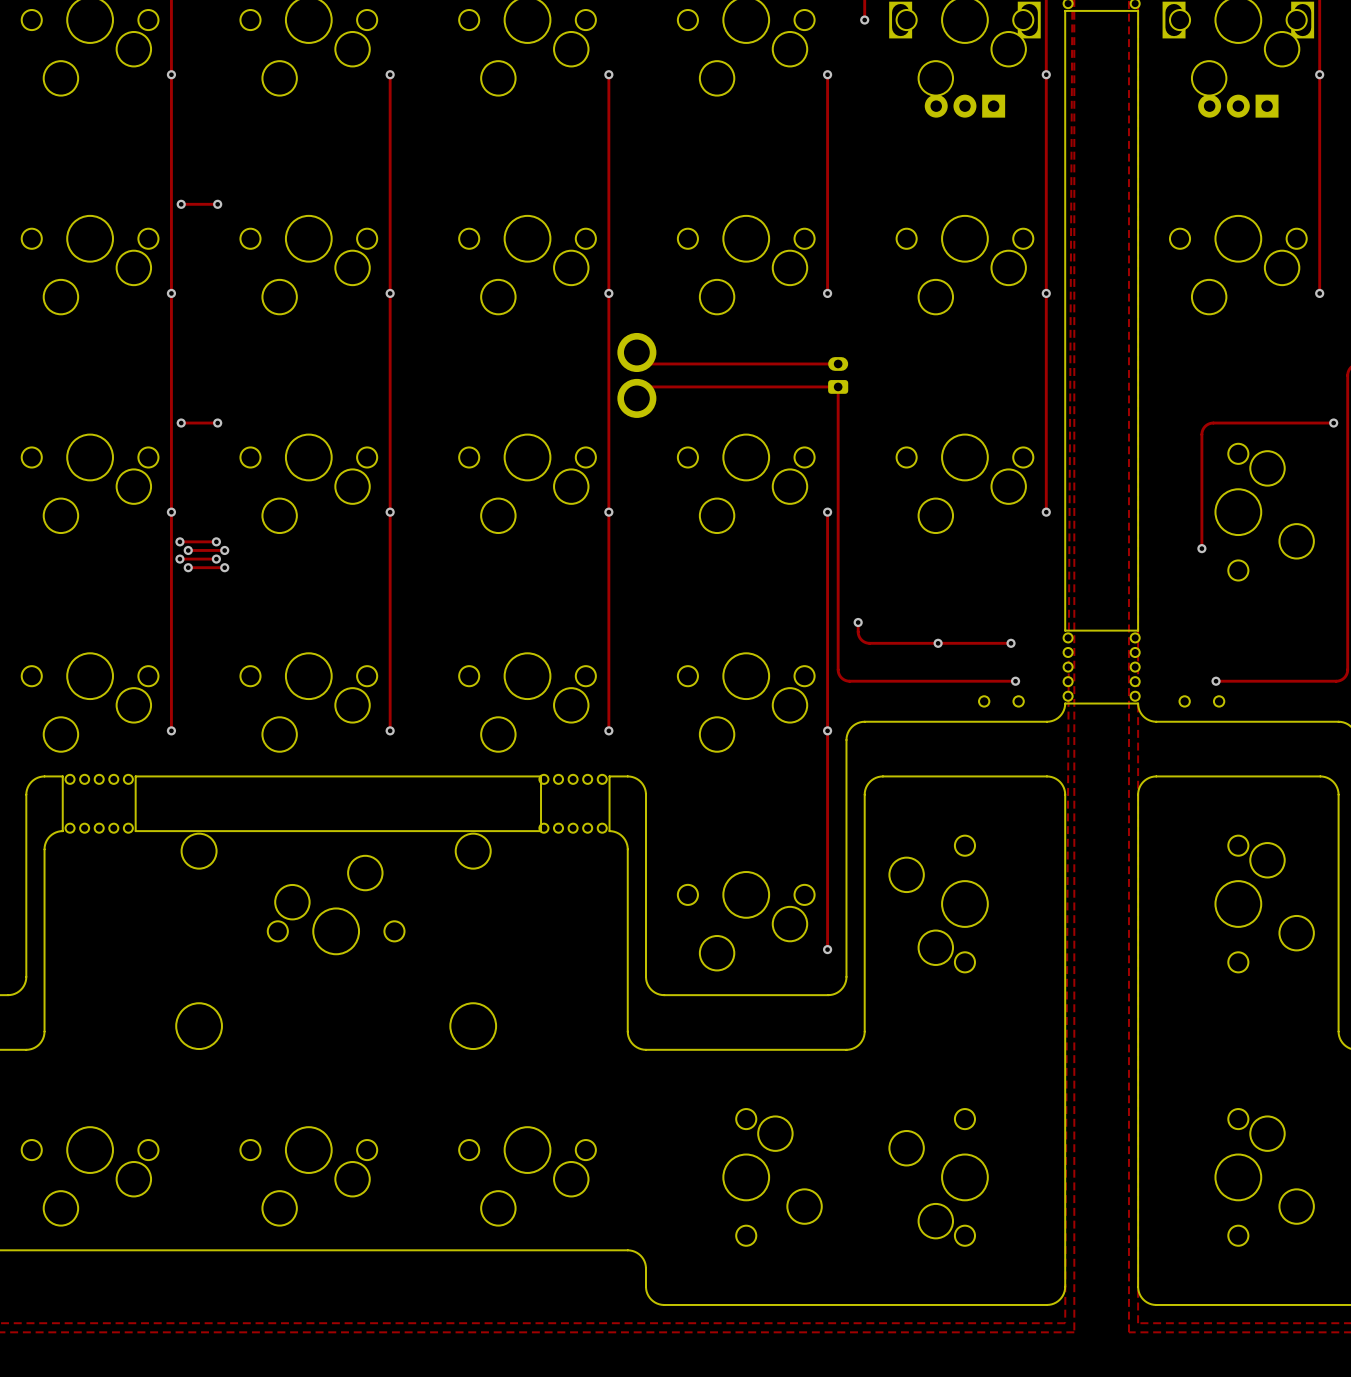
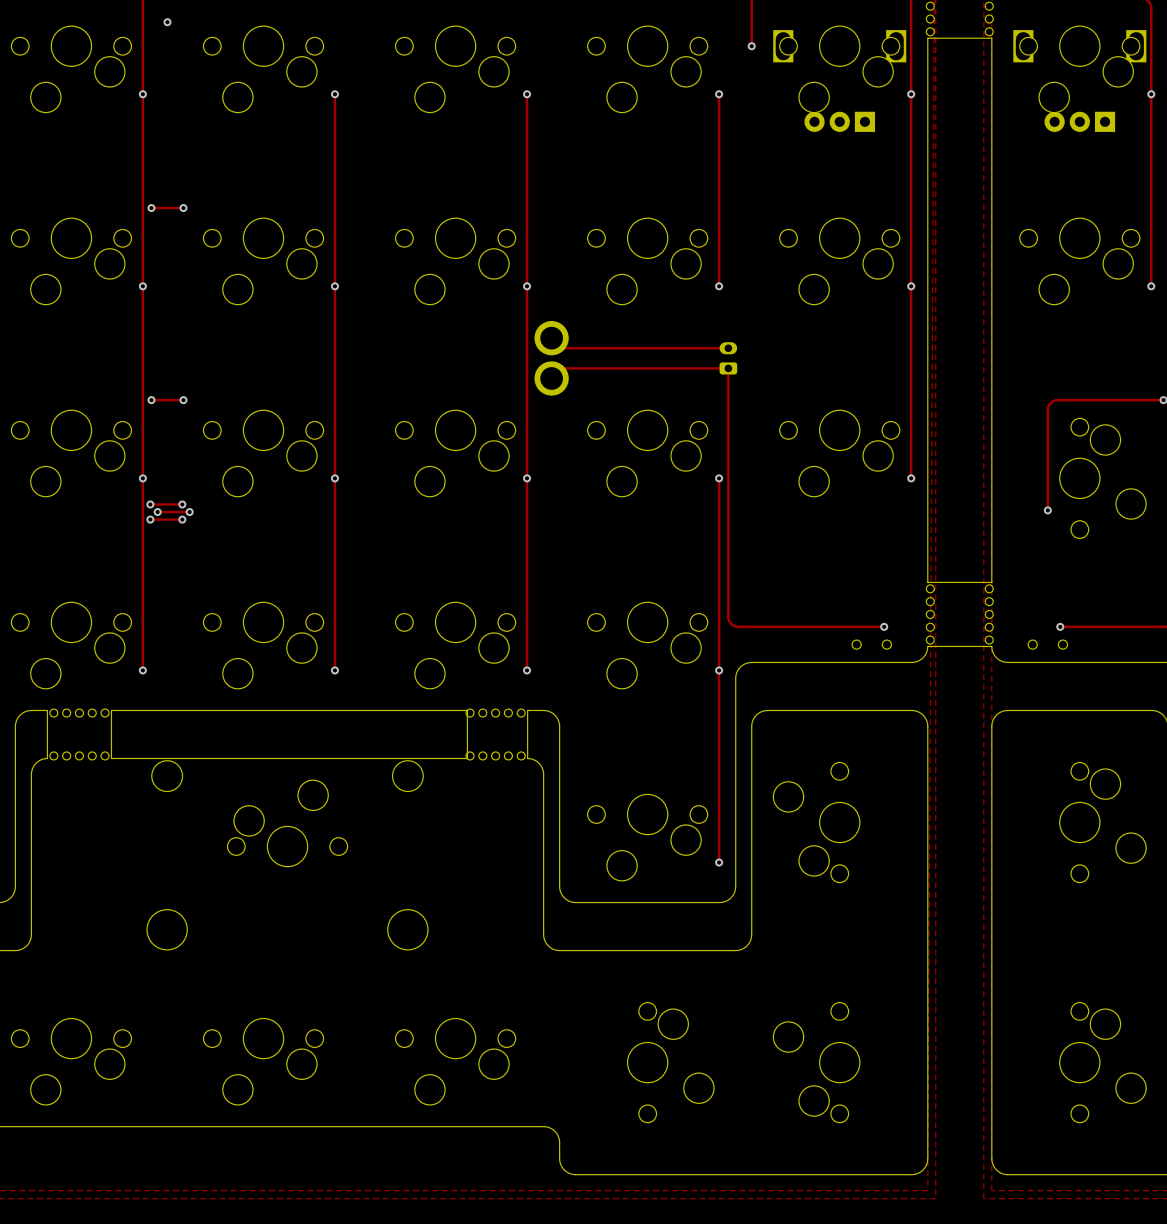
track: (188, 567) (224, 567) -> none
via: (188, 567) -> none
via: (224, 567) -> none
track: (858, 622) (859, 636) (868, 643) (1011, 643) -> none
via: (858, 622) -> none
via: (938, 643) -> none
via: (1011, 643) -> none

